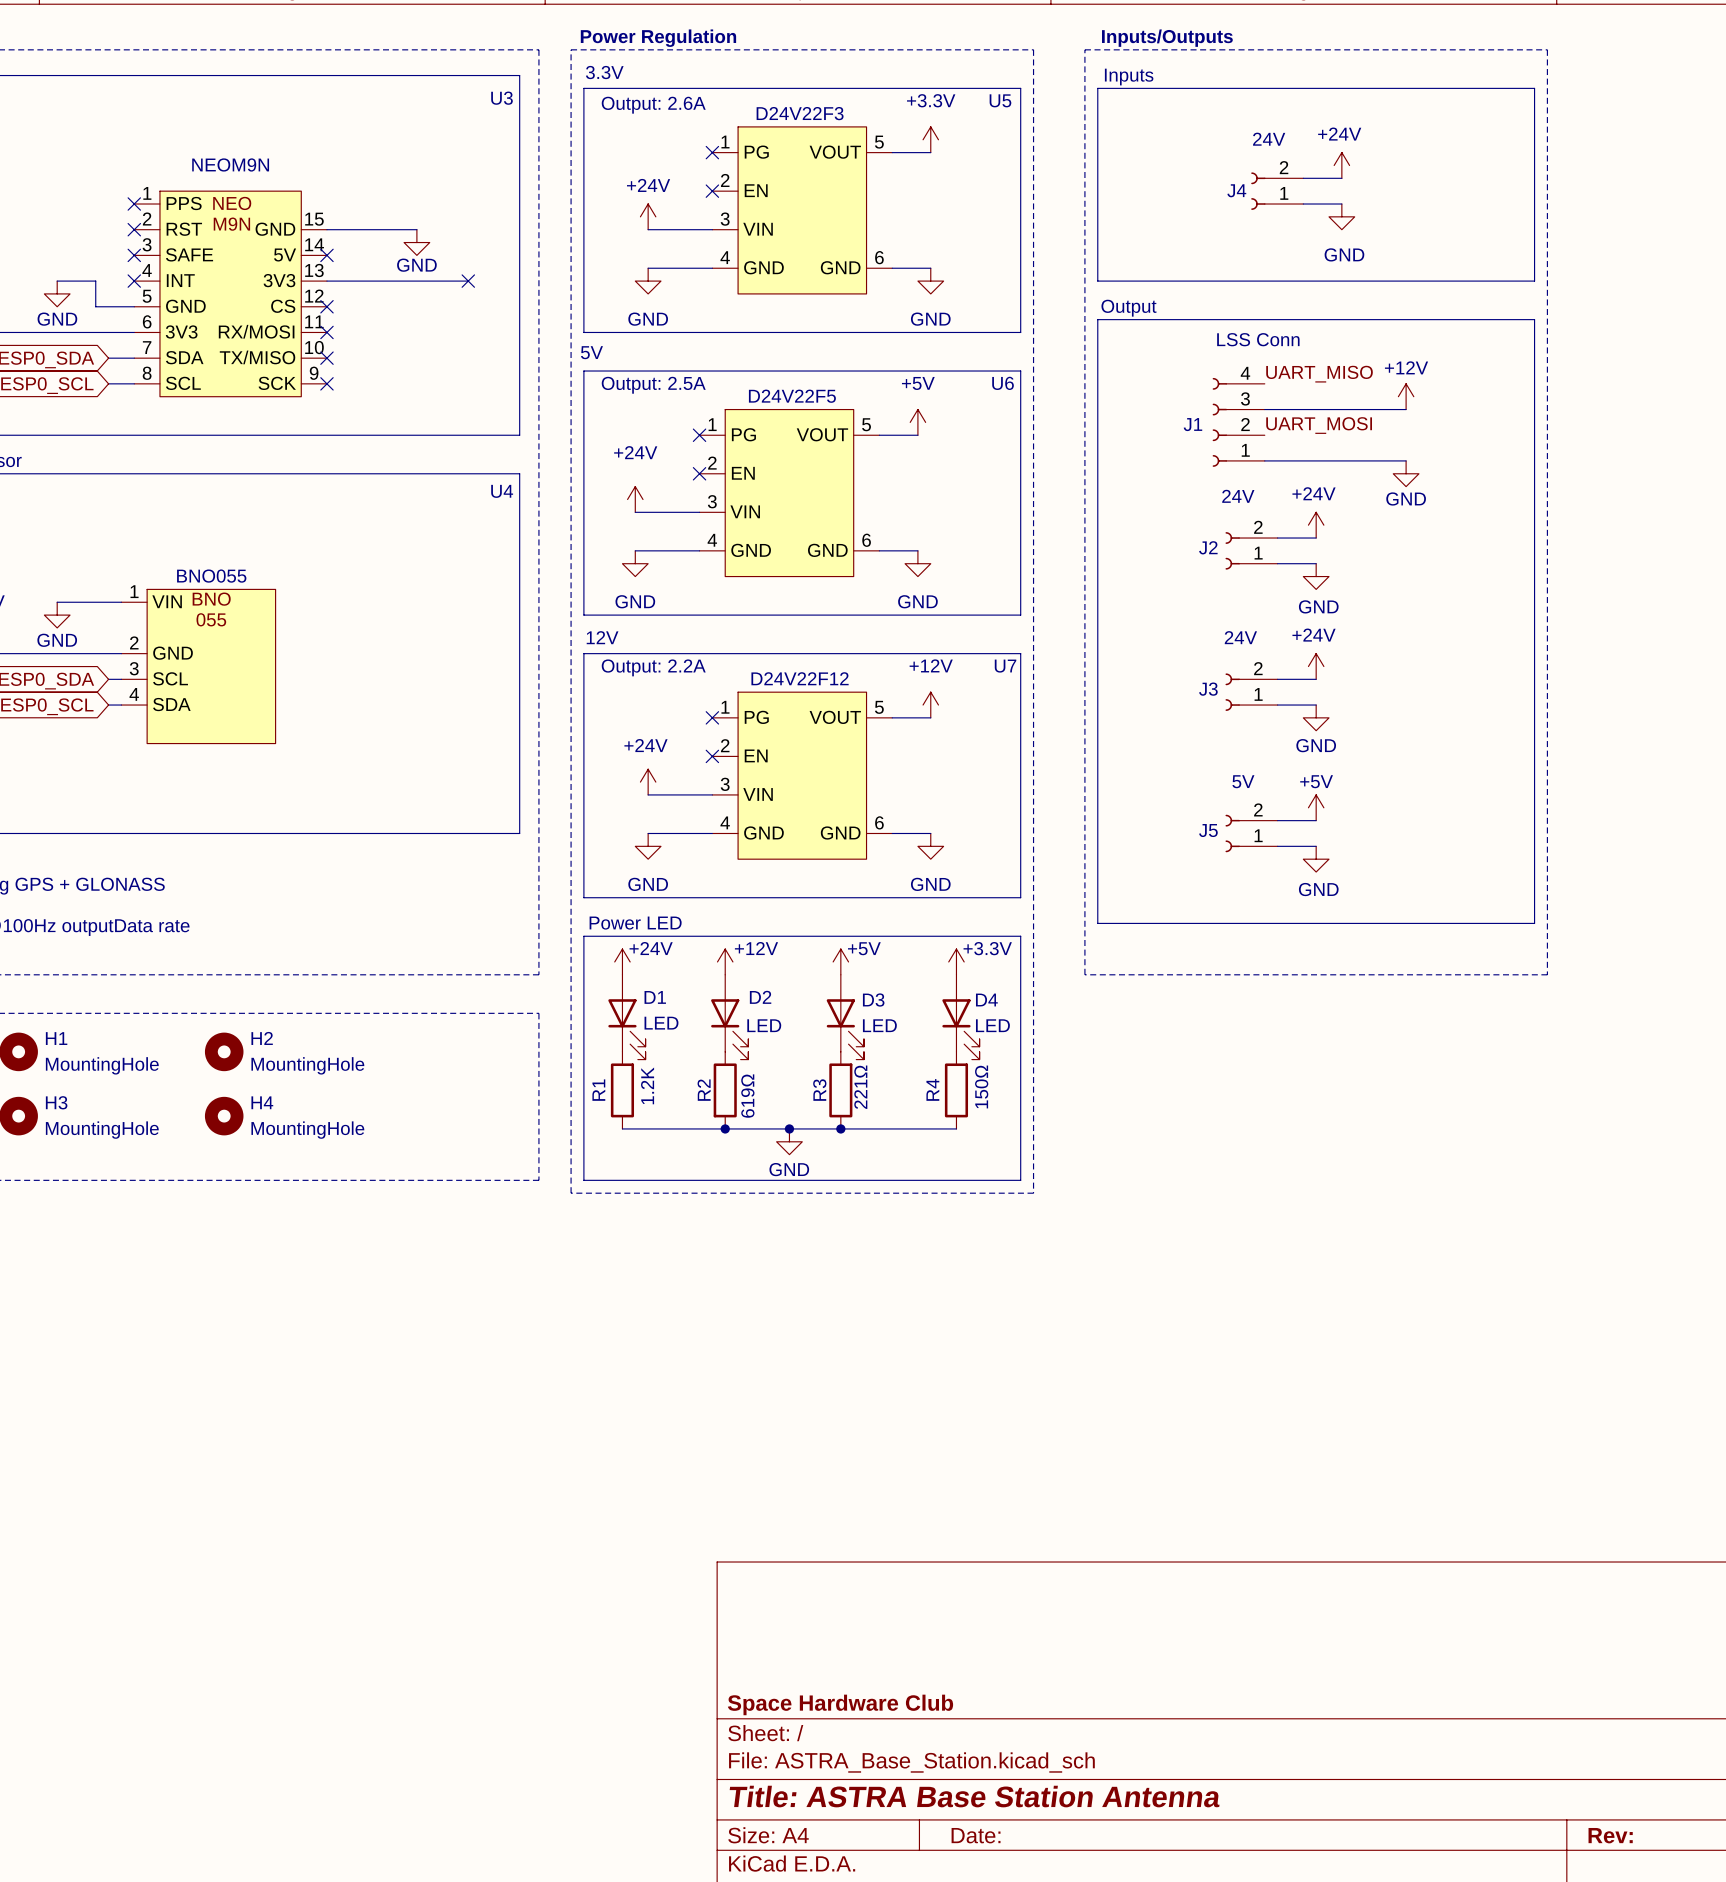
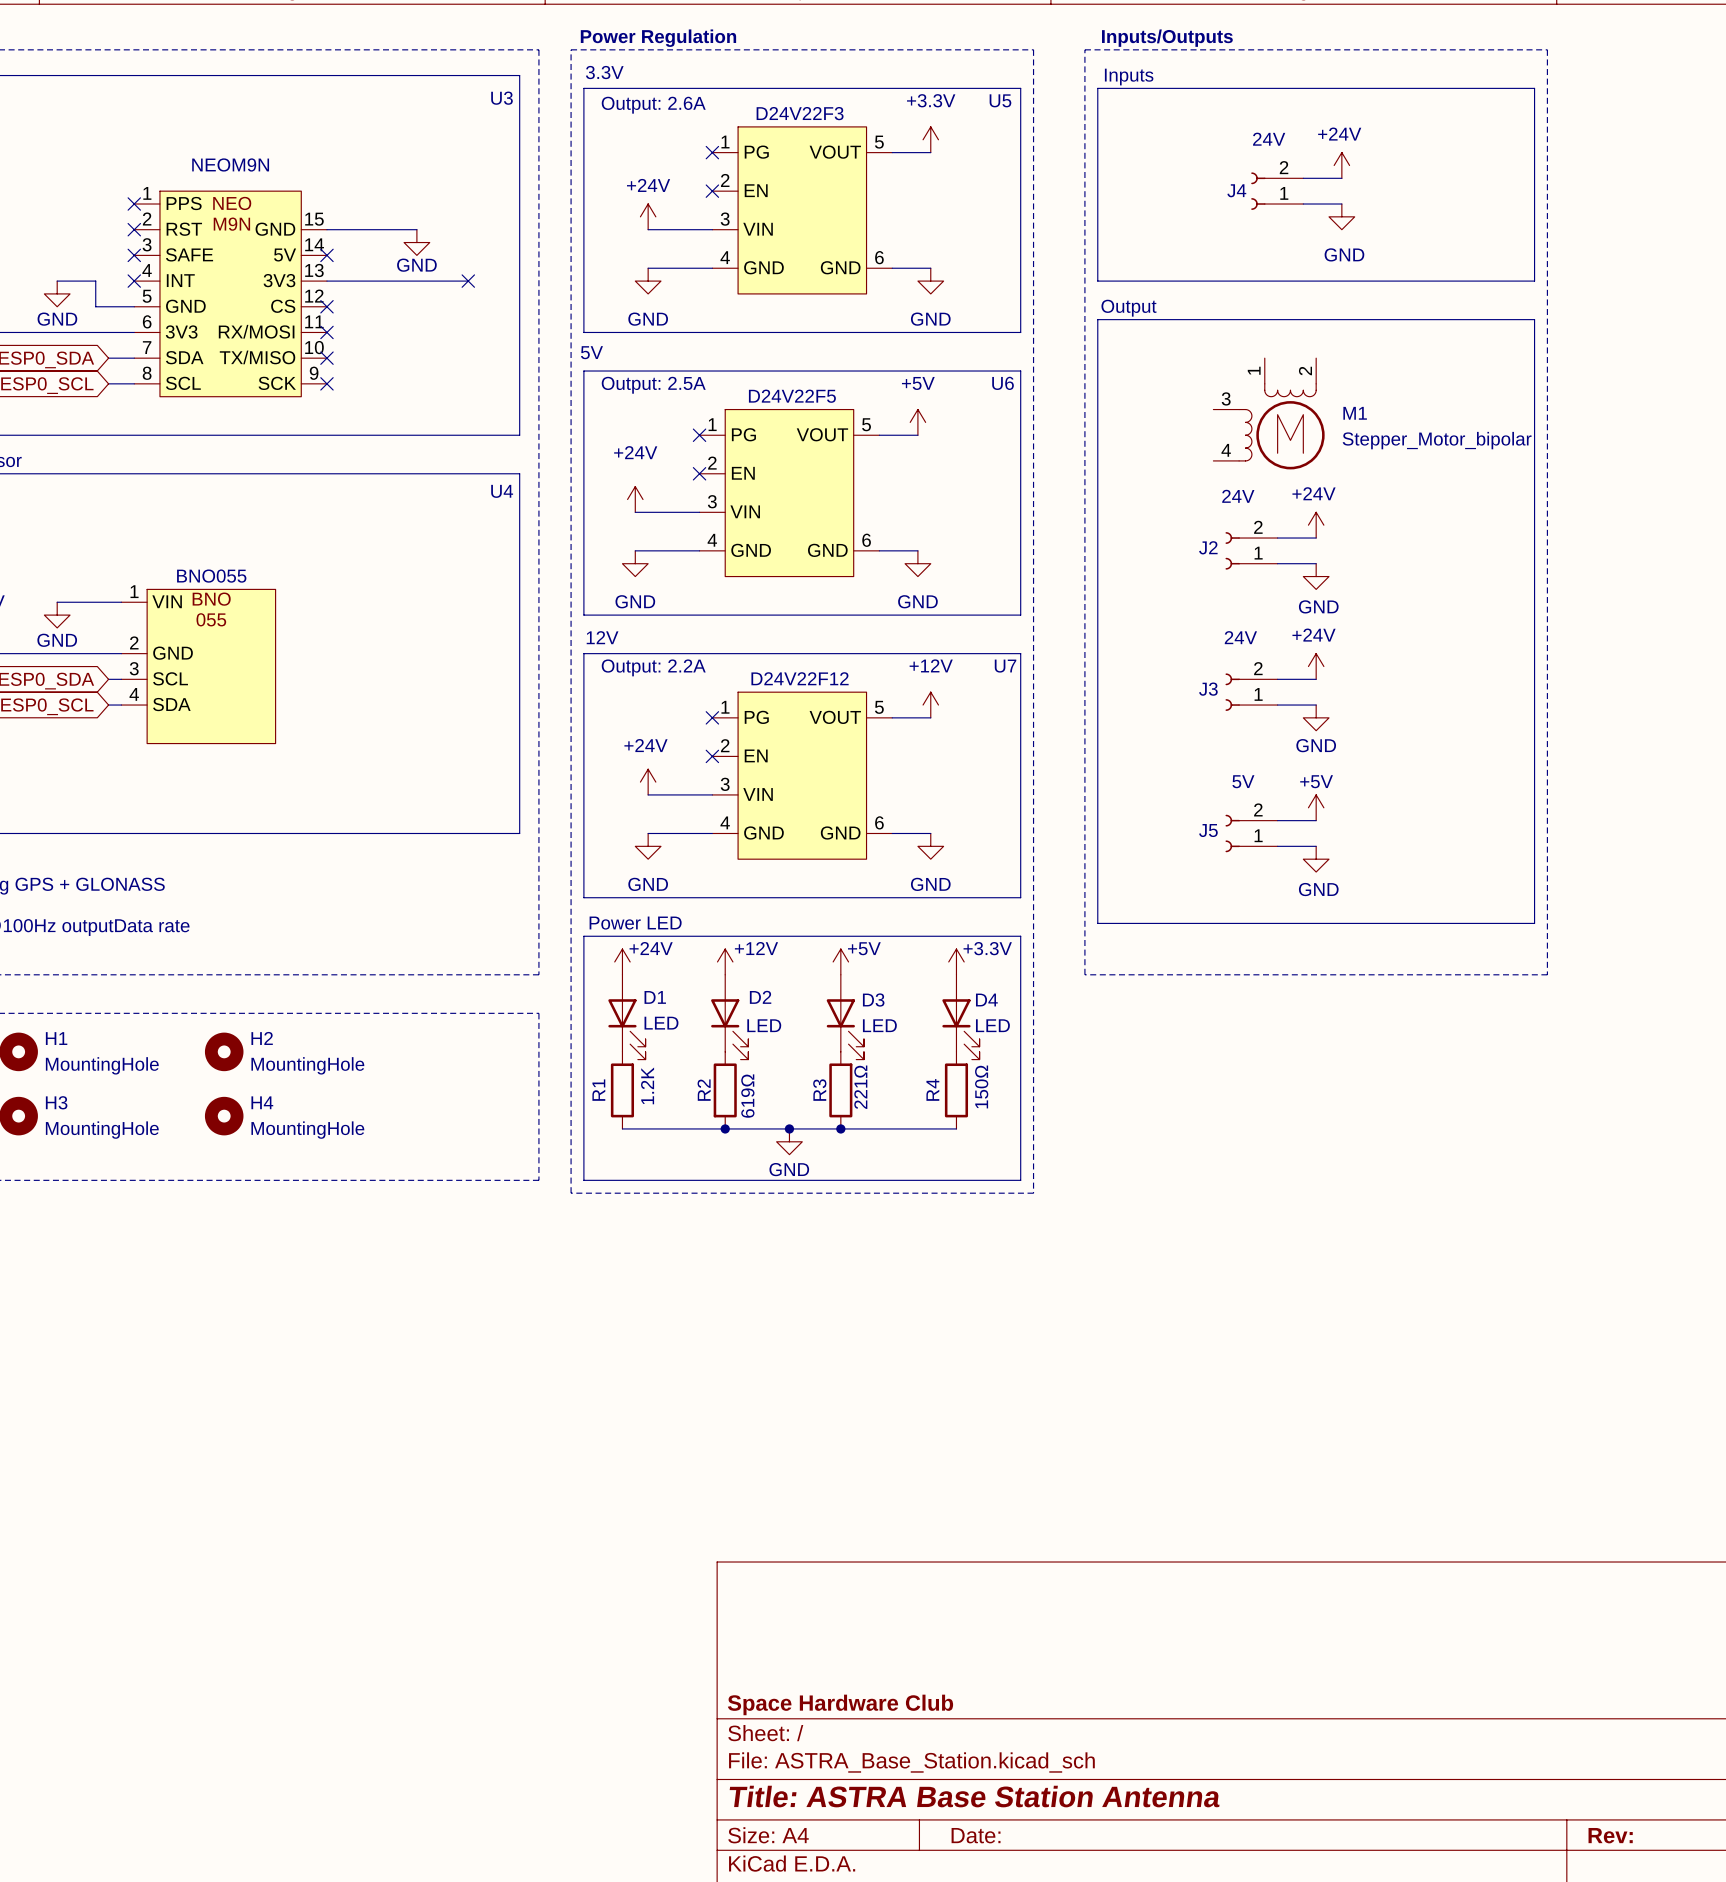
label: UART_MISO (1319, 374) -> none
power symbol: +12V (1406, 396) -> none
wire: (1264, 409) (1406, 409) -> none
M1: none -> Stepper_Motor_bipolar (1269, 413)
J1: LSS Conn (1238, 422) -> none
label: UART_MOSI (1319, 425) -> none
wire: (1264, 460) (1406, 460) -> none
power symbol: GND (1406, 473) -> none

